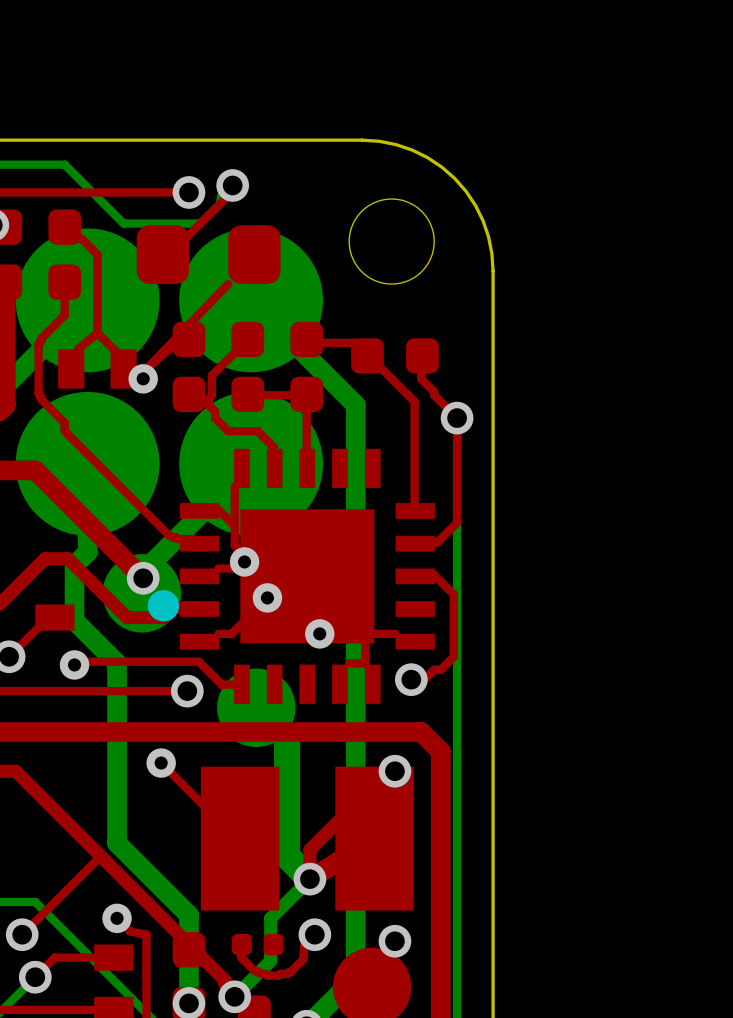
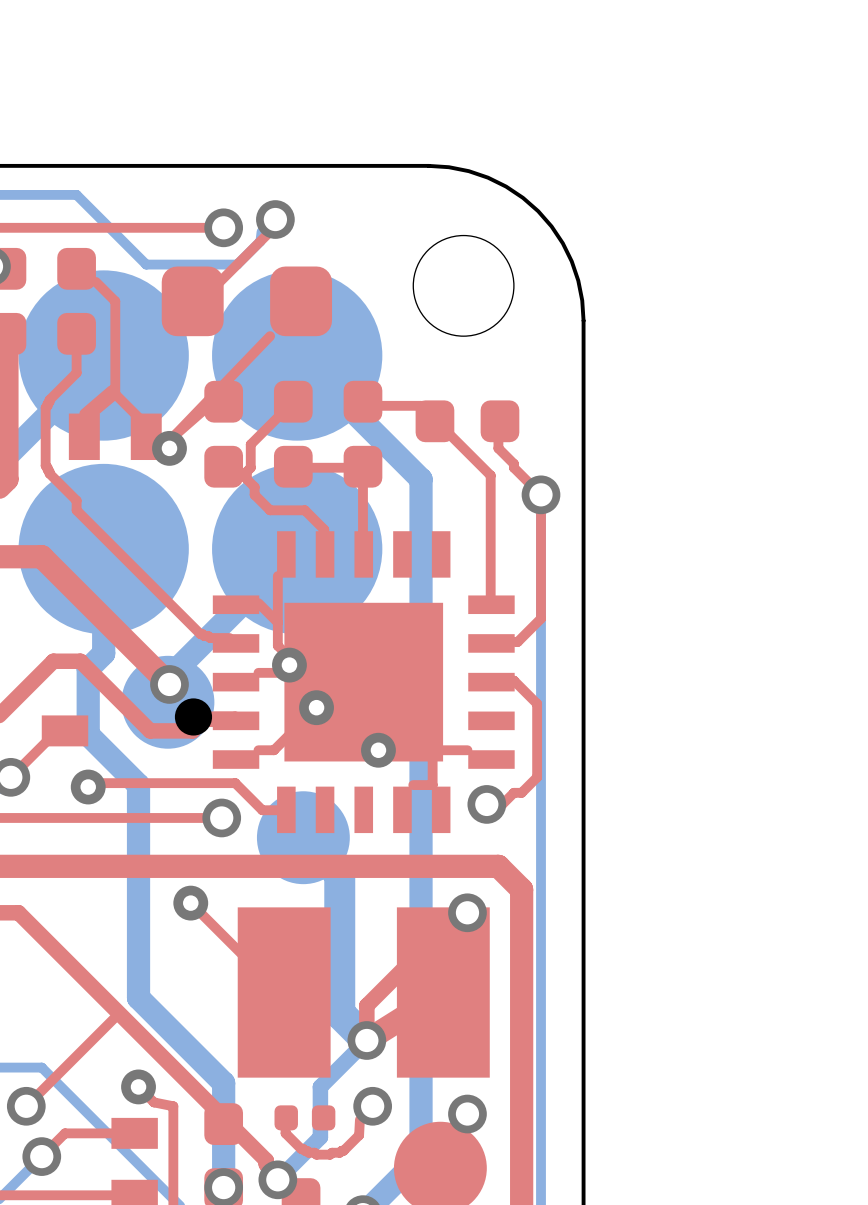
top track: none -> (111, 390) (84, 413)

